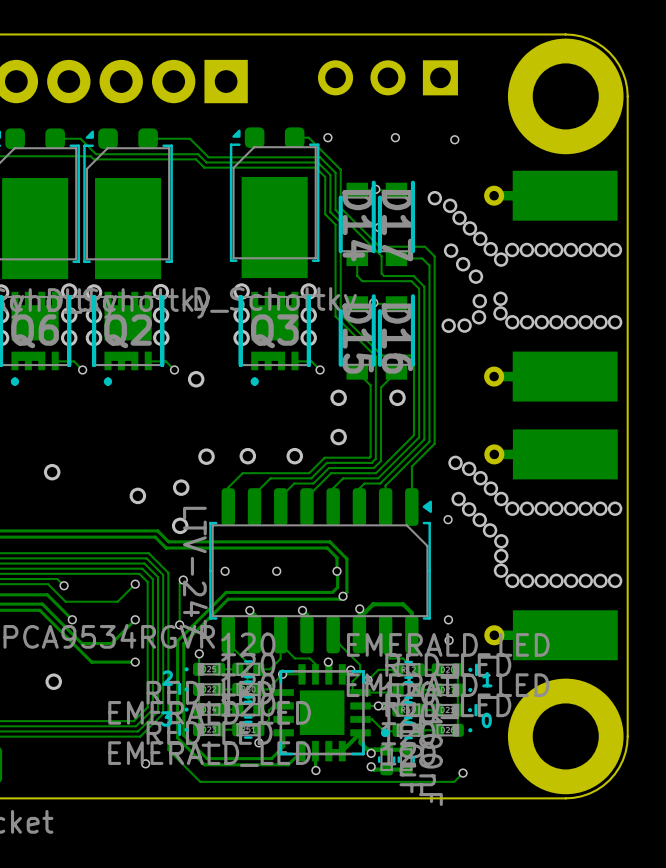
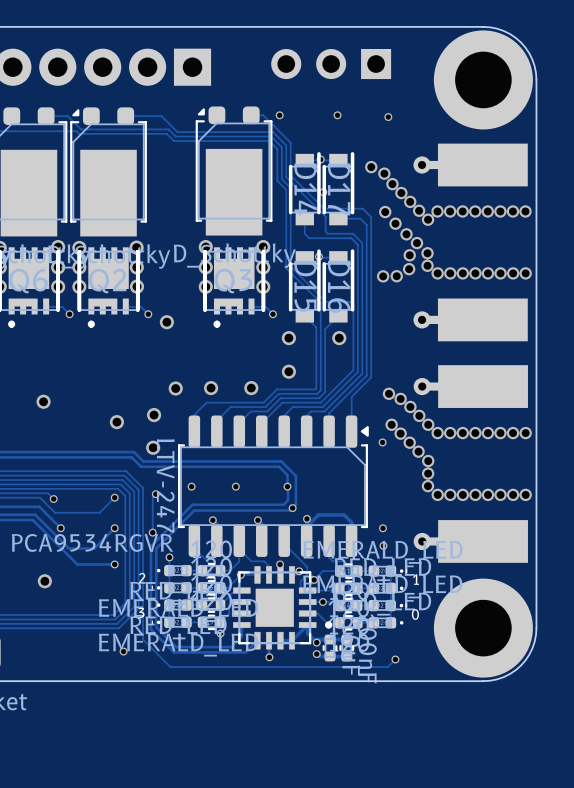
via: none -> (416, 243)

